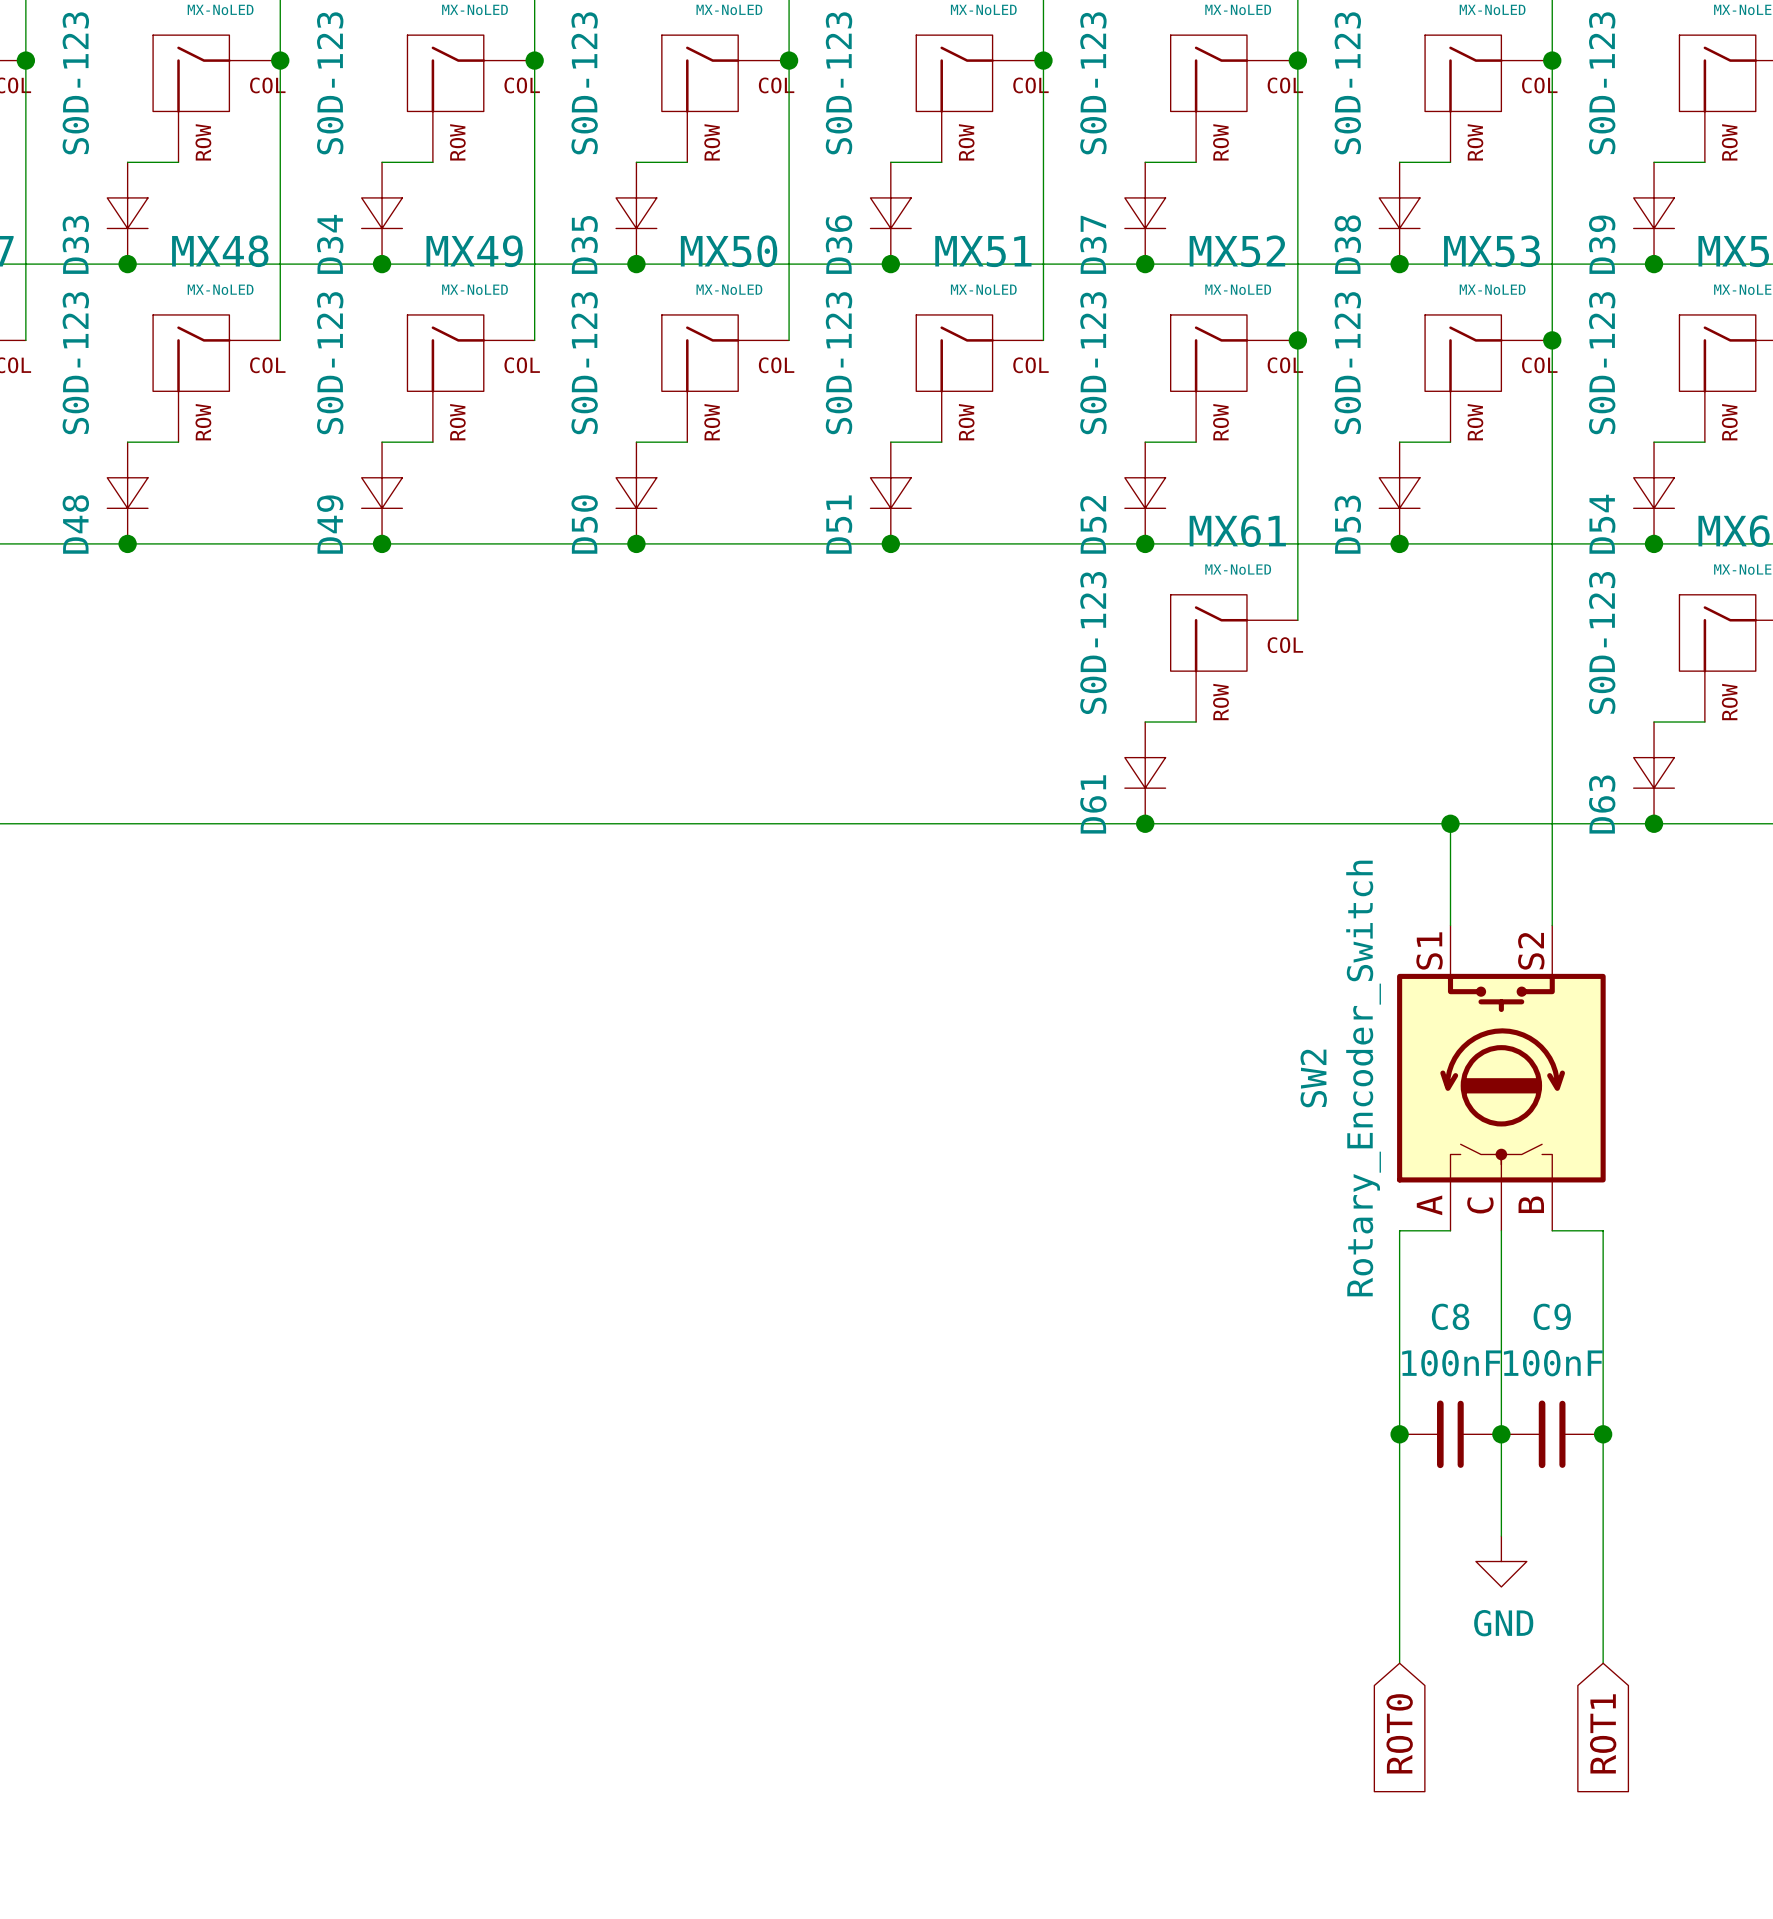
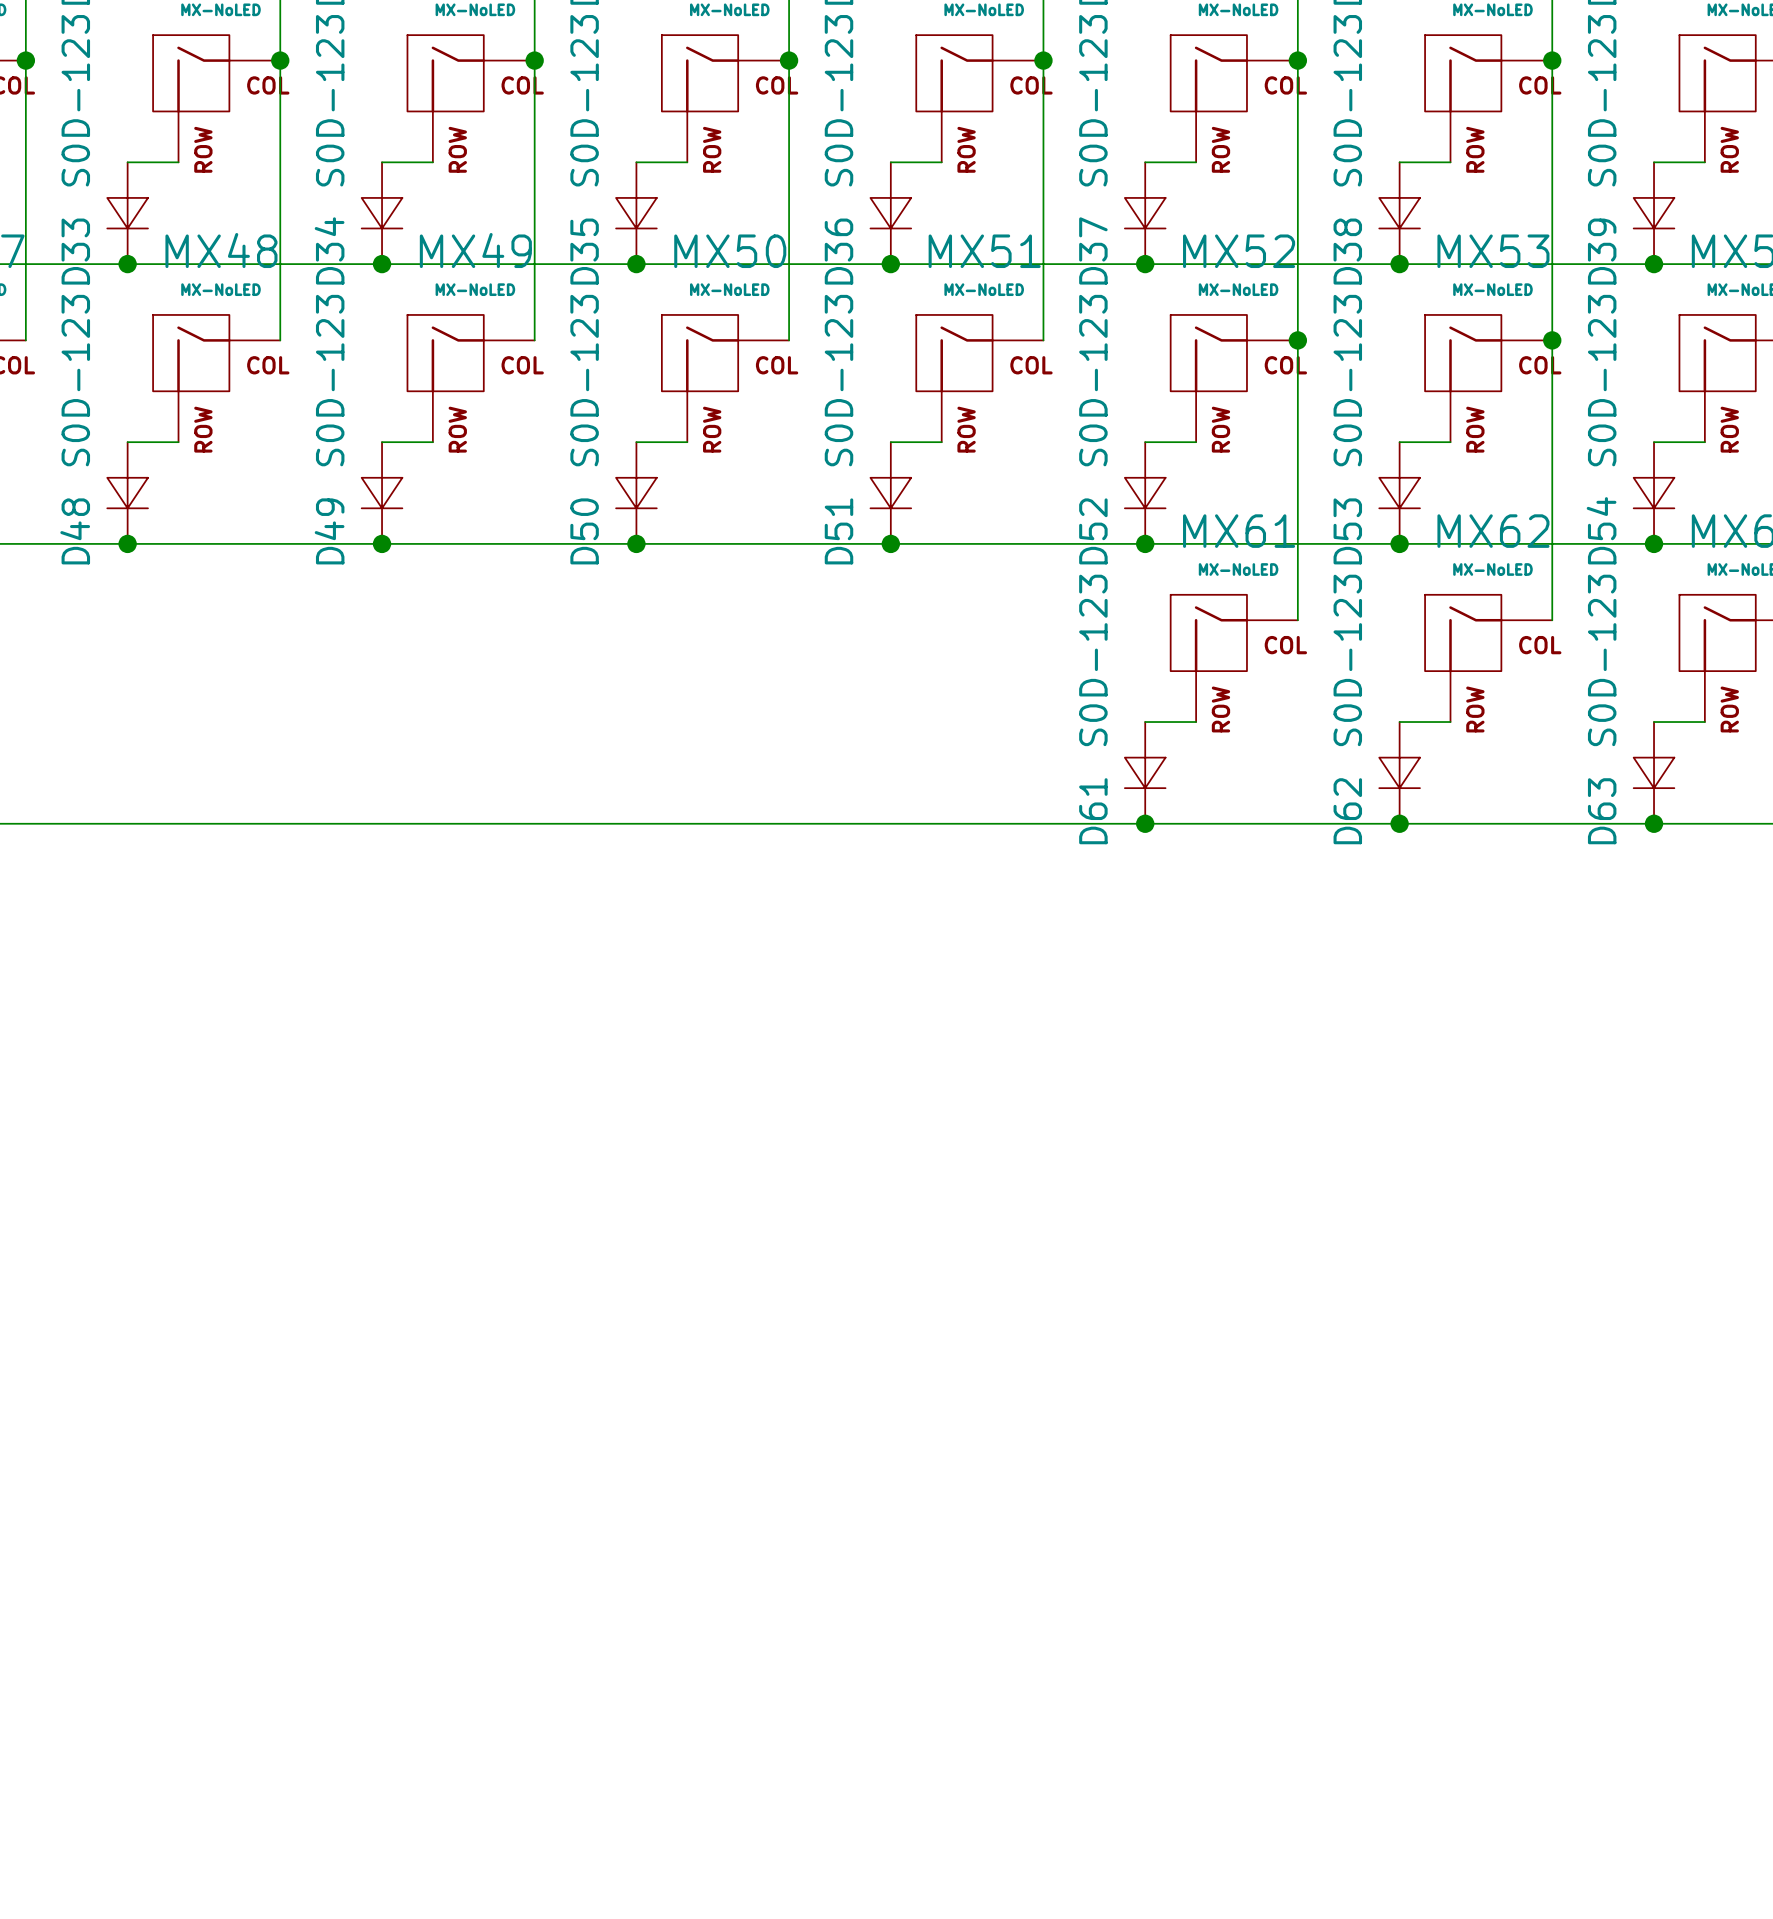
wire: (1552, 620) (1552, 925) -> none
MX62: none -> MX-NoLED (1488, 658)
wire: none -> (1399, 722) (1450, 722)
D62: none -> S0D-123 (1399, 772)
wire: (1450, 823) (1450, 925) -> none
junction position: (1450, 823) -> (1399, 823)
SW2: Rotary_Encoder_Switch (1501, 1078) -> none
wire: (1450, 1230) (1399, 1230) (1399, 1663) -> none
wire: (1501, 1230) (1501, 1536) -> none
wire: (1552, 1230) (1603, 1230) (1603, 1663) -> none
junction: (1399, 1434) -> none
C8: 100nF (1450, 1434) -> none
junction: (1501, 1434) -> none
C9: 100nF (1552, 1434) -> none
junction: (1603, 1434) -> none
power symbol: GND (1501, 1561) -> none
global label: ROT0 (1399, 1733) -> none
global label: ROT1 (1603, 1733) -> none

